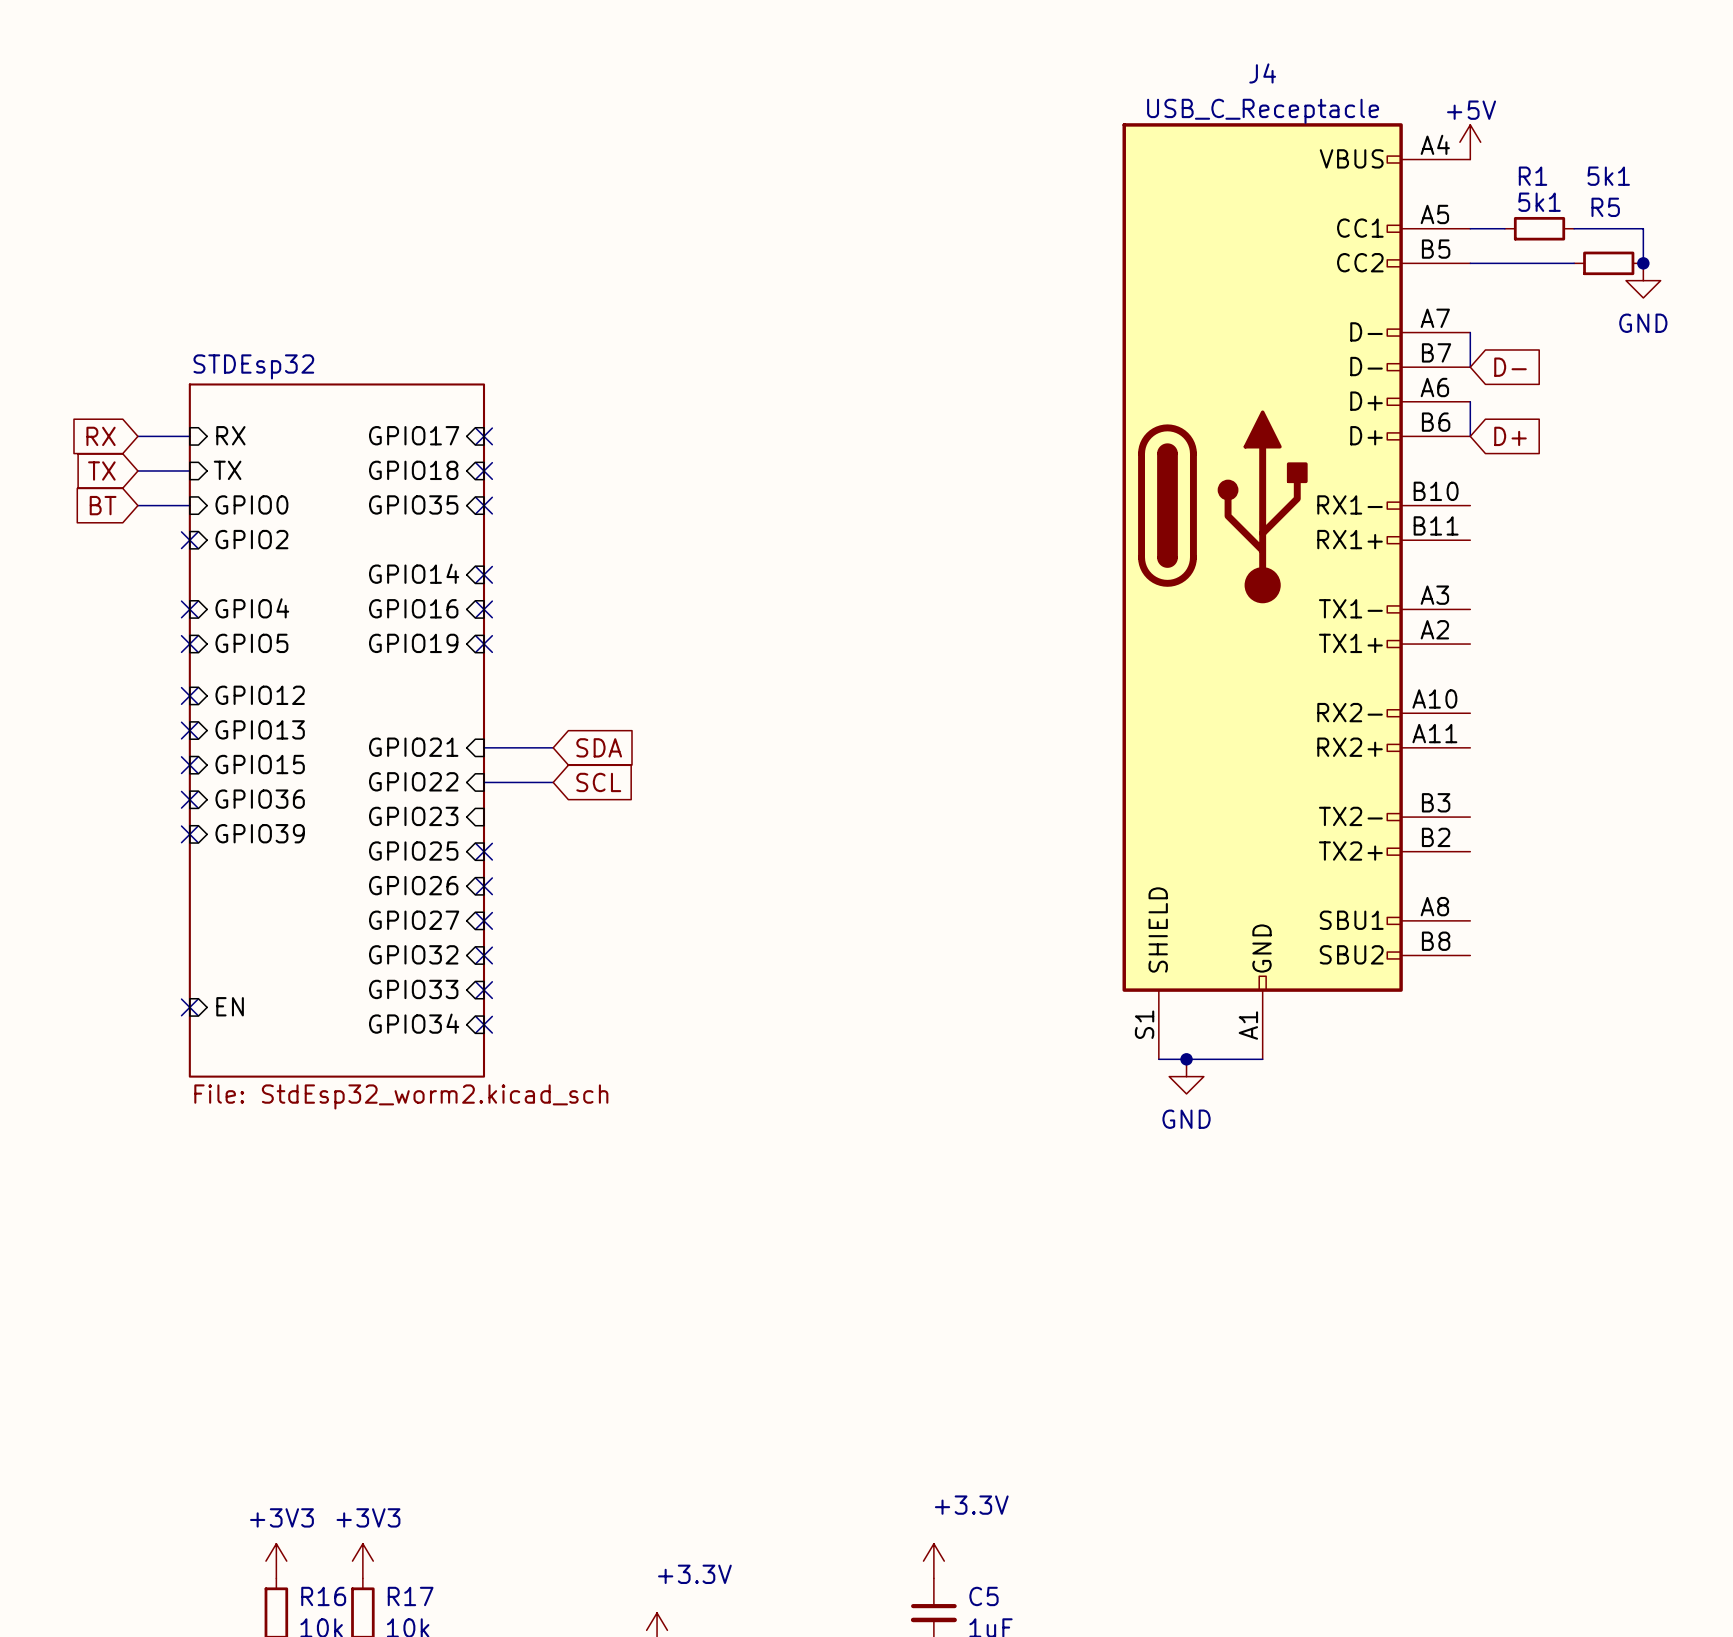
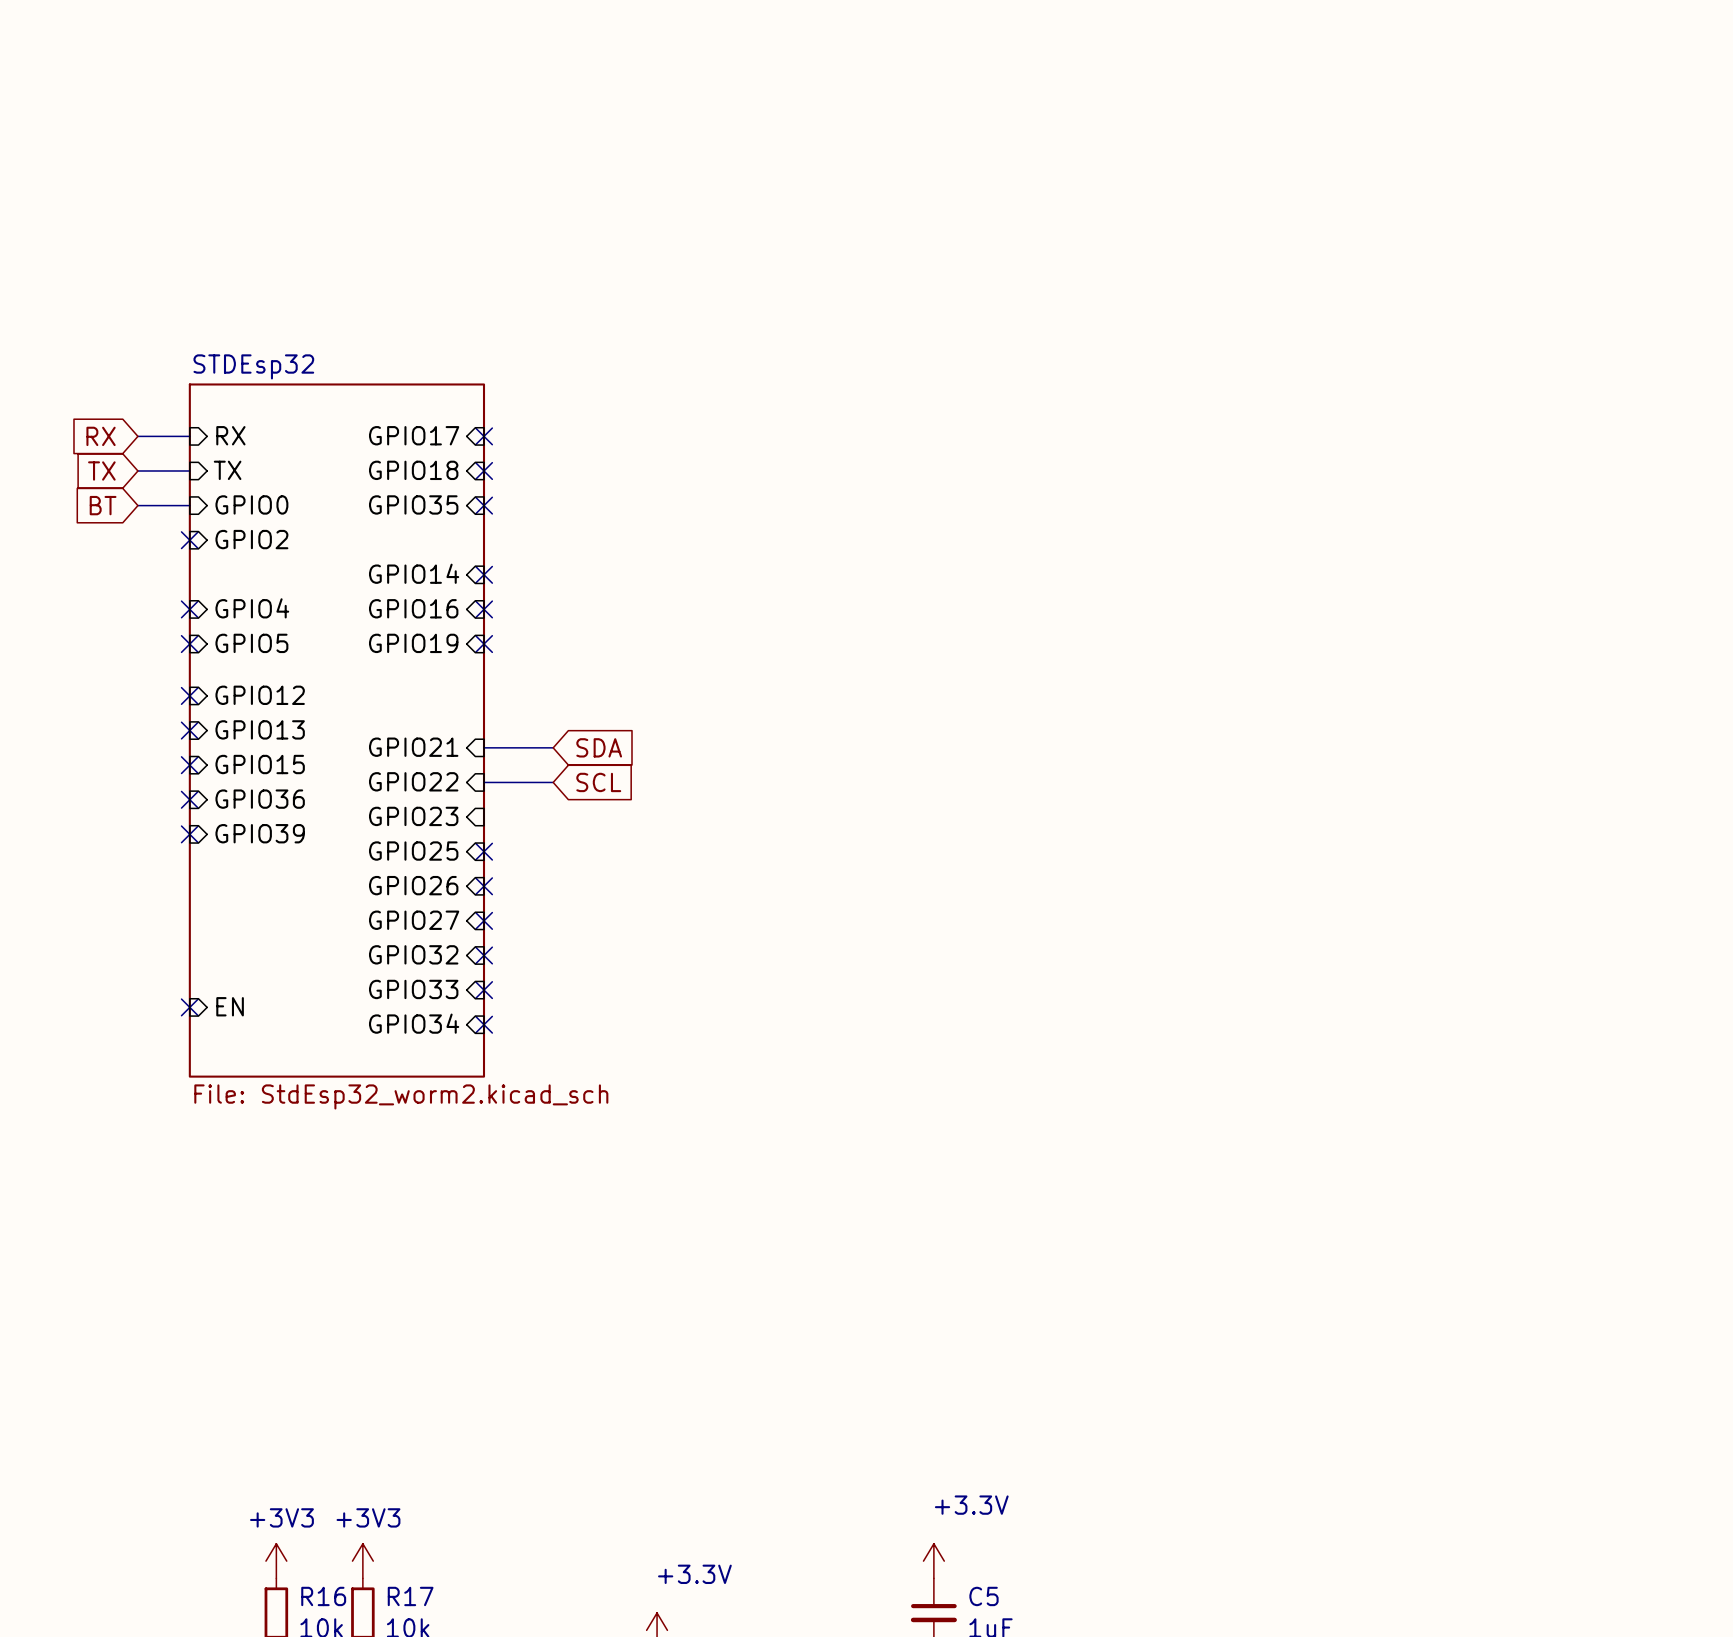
power symbol: +5V (1470, 142) -> none
wire: (1470, 228) (1504, 228) -> none
R1: 5k1 (1539, 228) -> none
wire: (1574, 228) (1643, 228) (1643, 263) -> none
wire: (1470, 263) (1574, 263) -> none
R5: 5k1 (1608, 263) -> none
junction: (1643, 263) -> none
power symbol: GND (1643, 280) -> none
wire: (1470, 332) (1470, 367) -> none
global label: D- (1510, 367) -> none
wire: (1470, 401) (1470, 436) -> none
global label: D+ (1510, 436) -> none
J4: USB_C_Receptacle (1296, 591) -> none
wire: (1158, 1059) (1262, 1059) -> none
junction: (1186, 1059) -> none
power symbol: GND (1186, 1076) -> none

